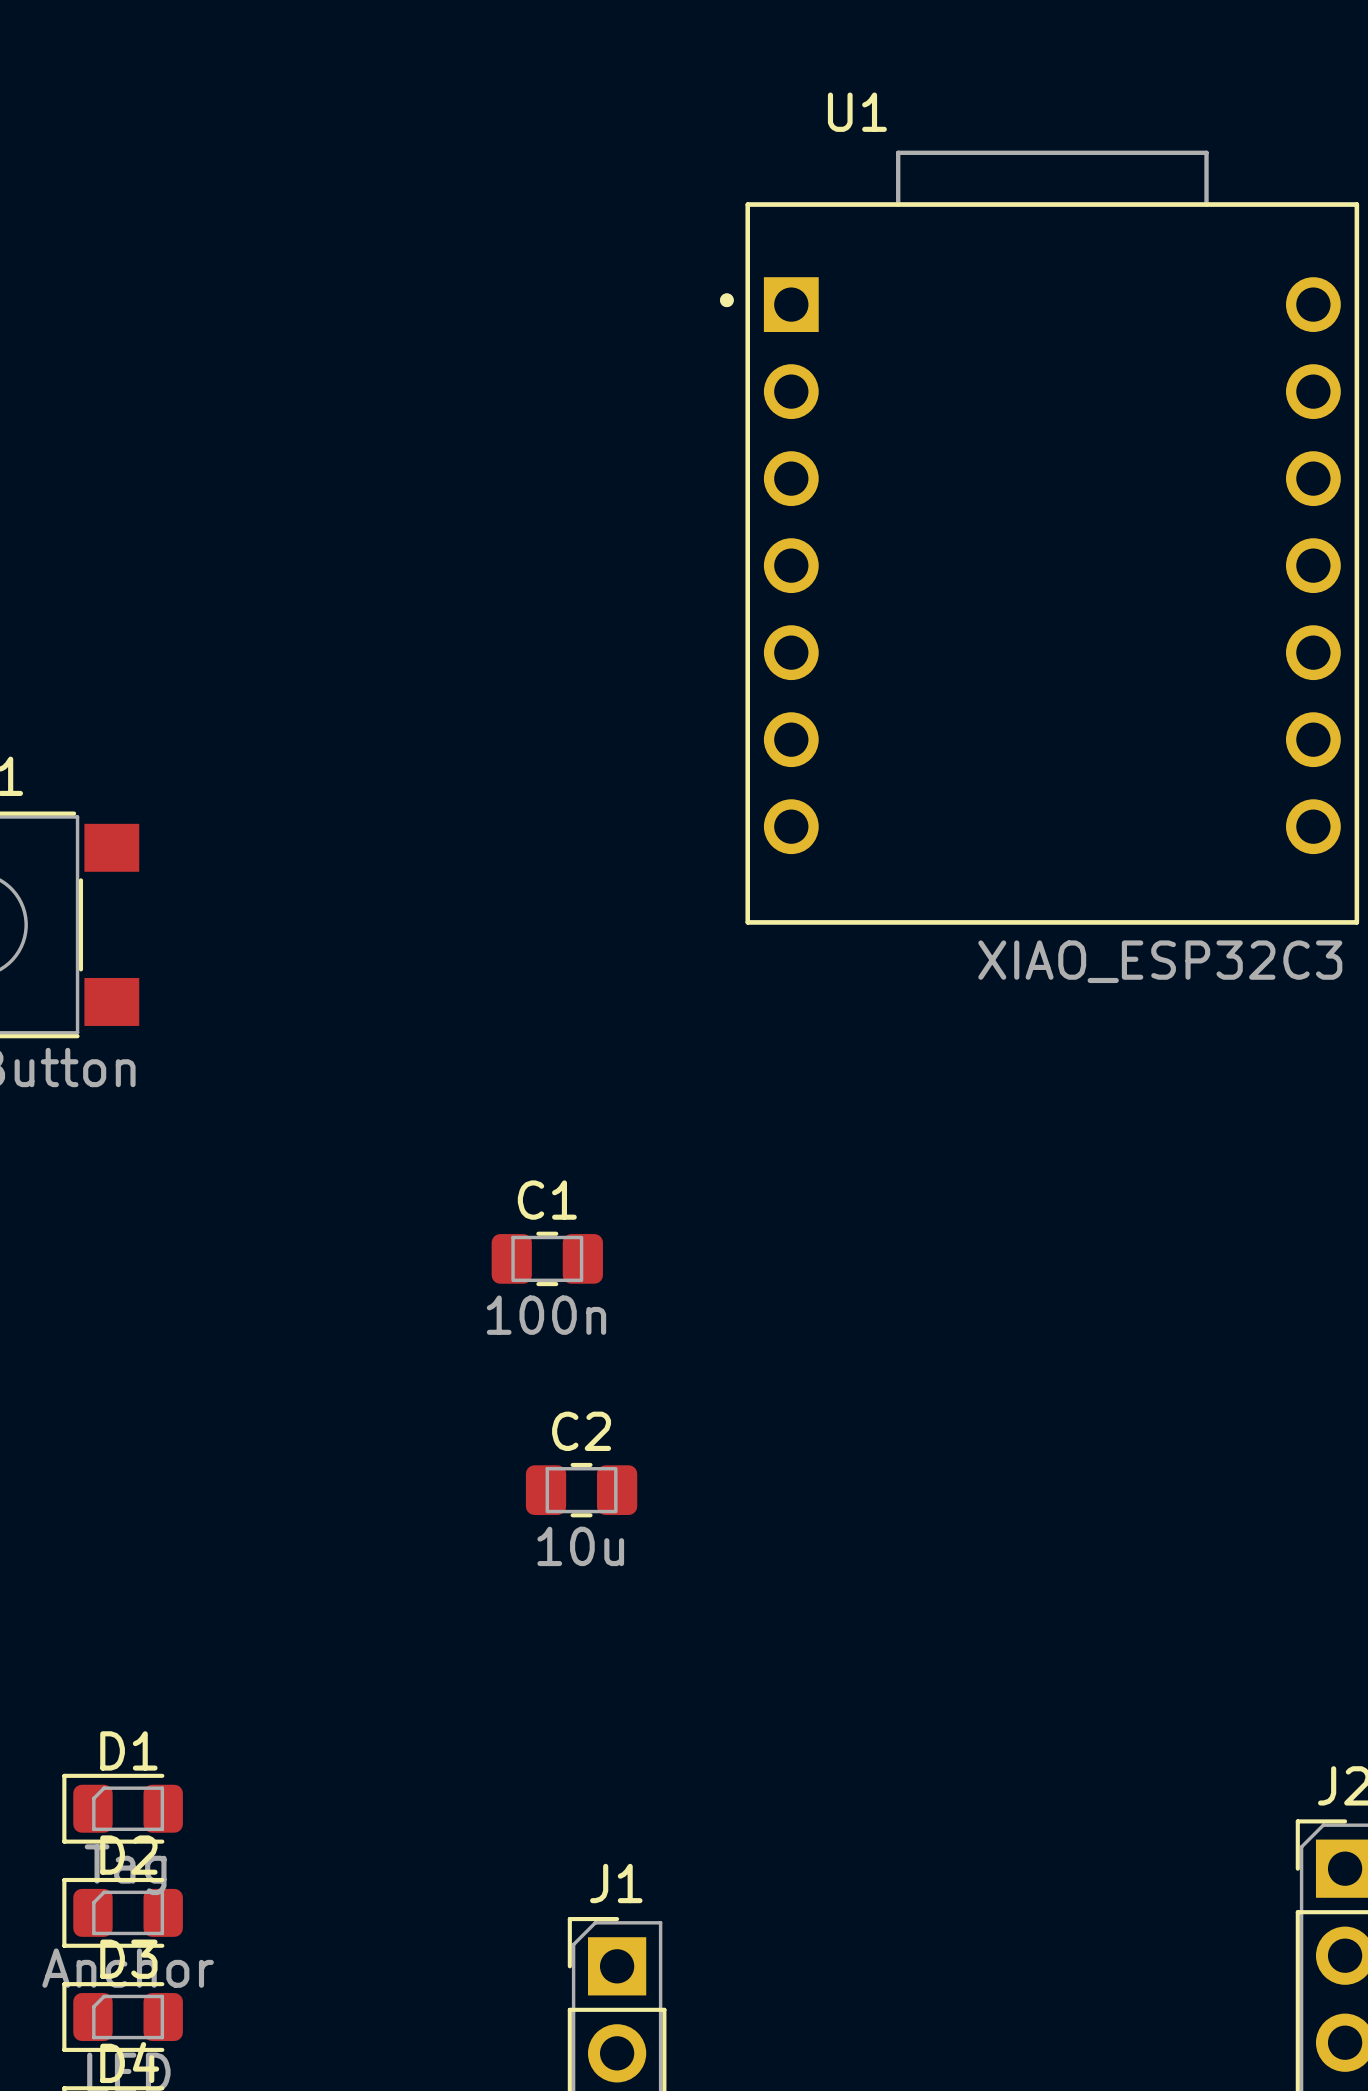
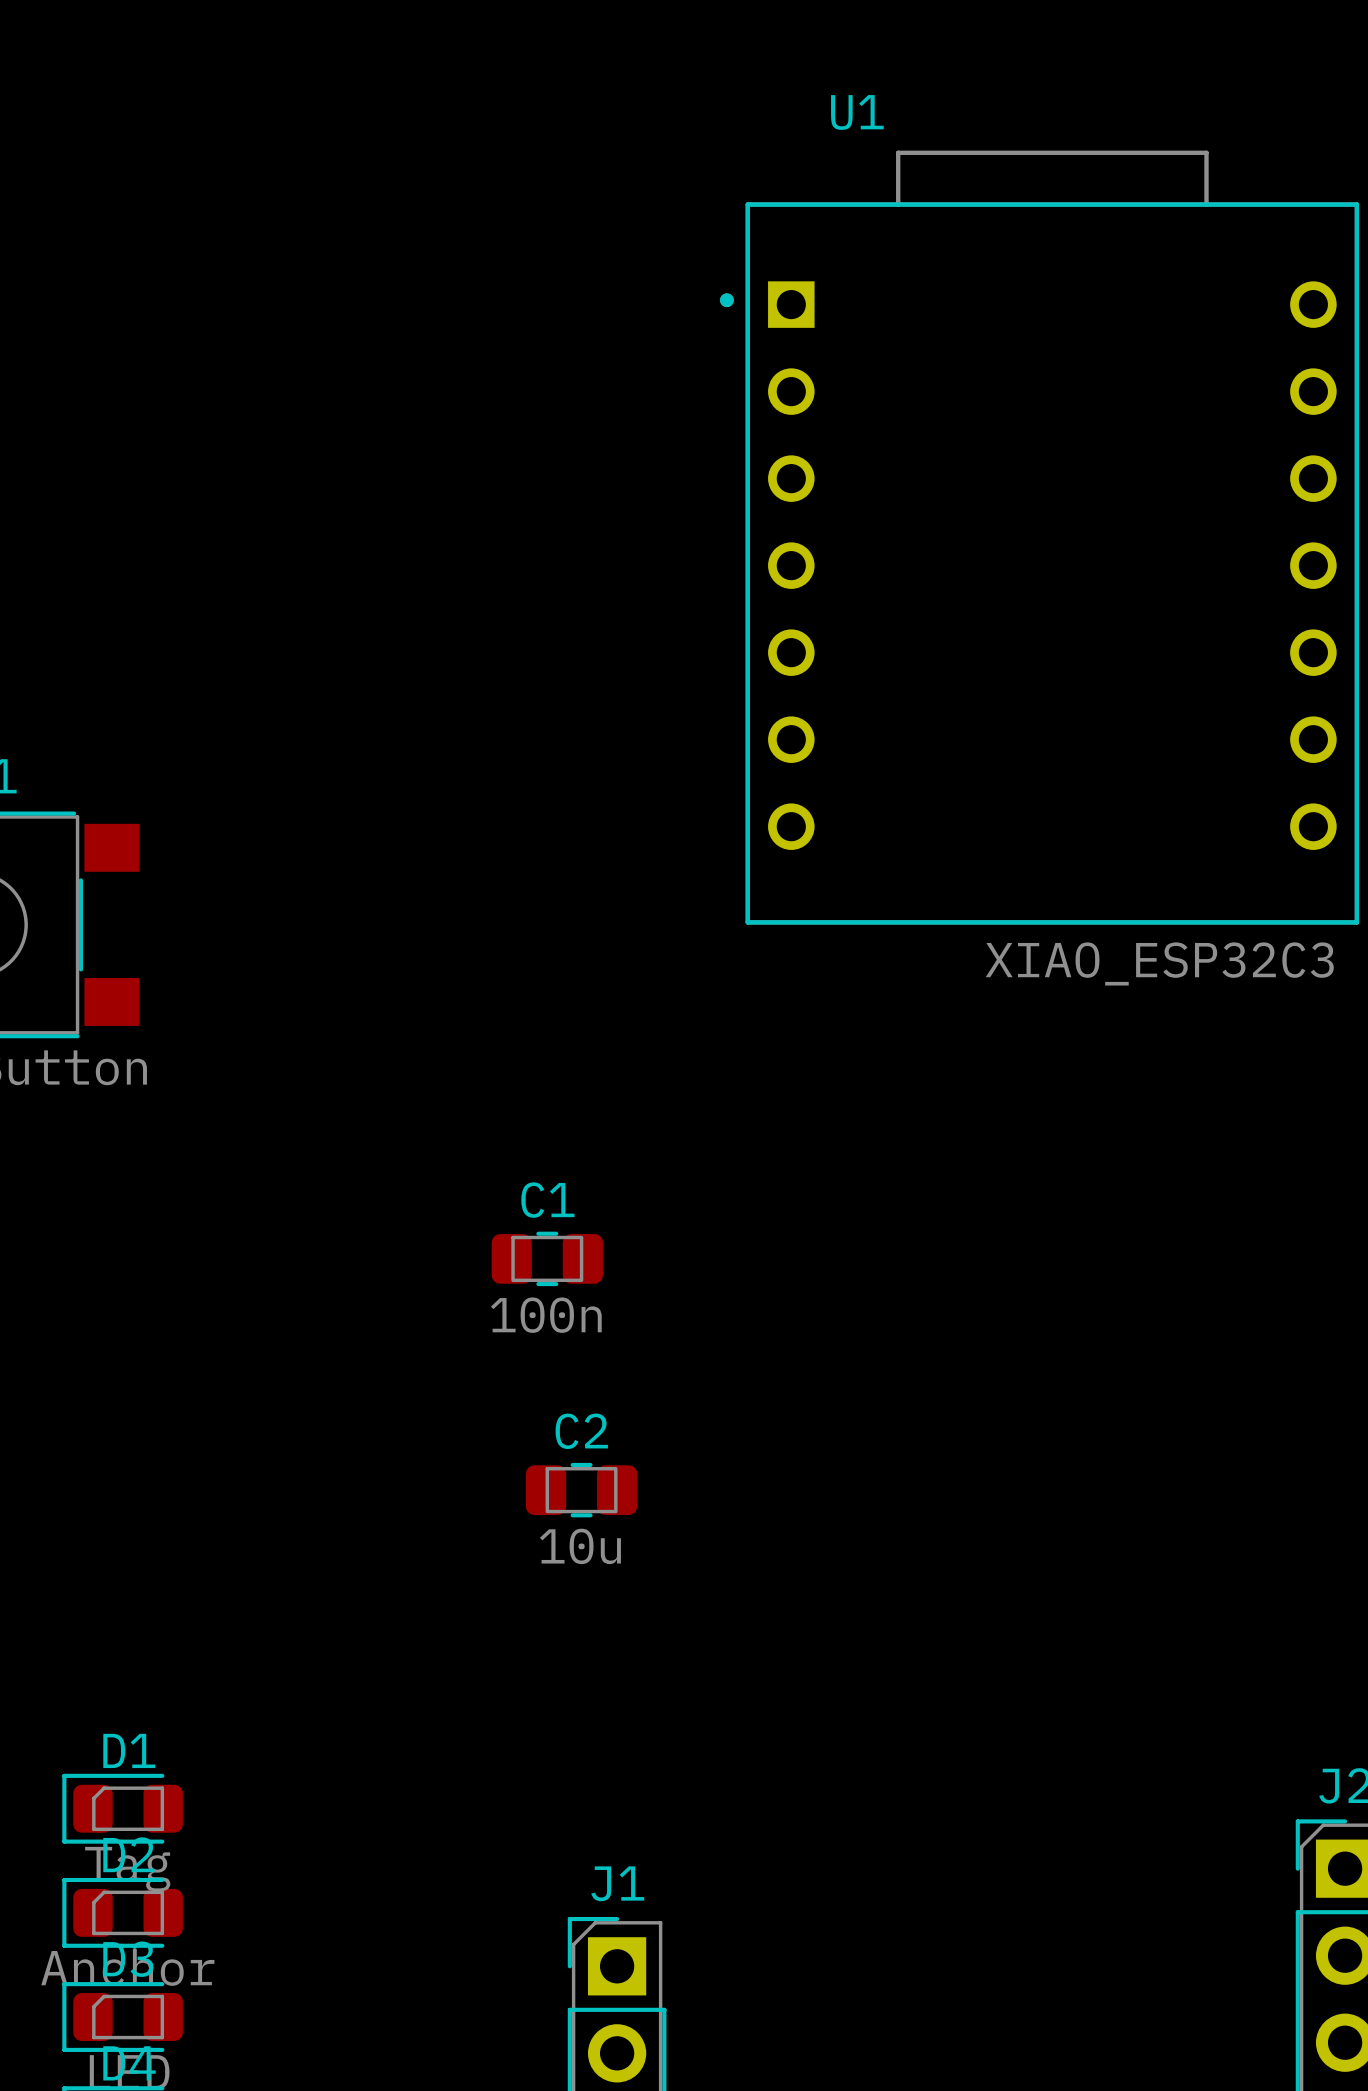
U1 footprint: [720, 150, 1360, 925] -> [720, 150, 1360, 925]

